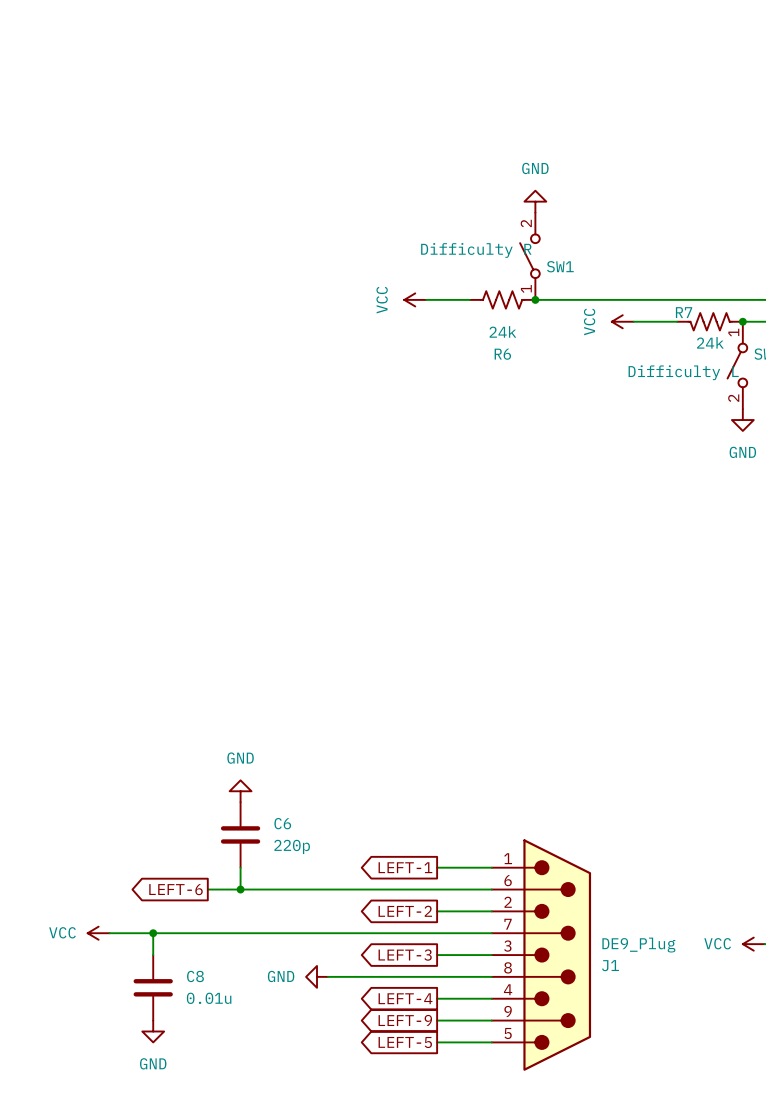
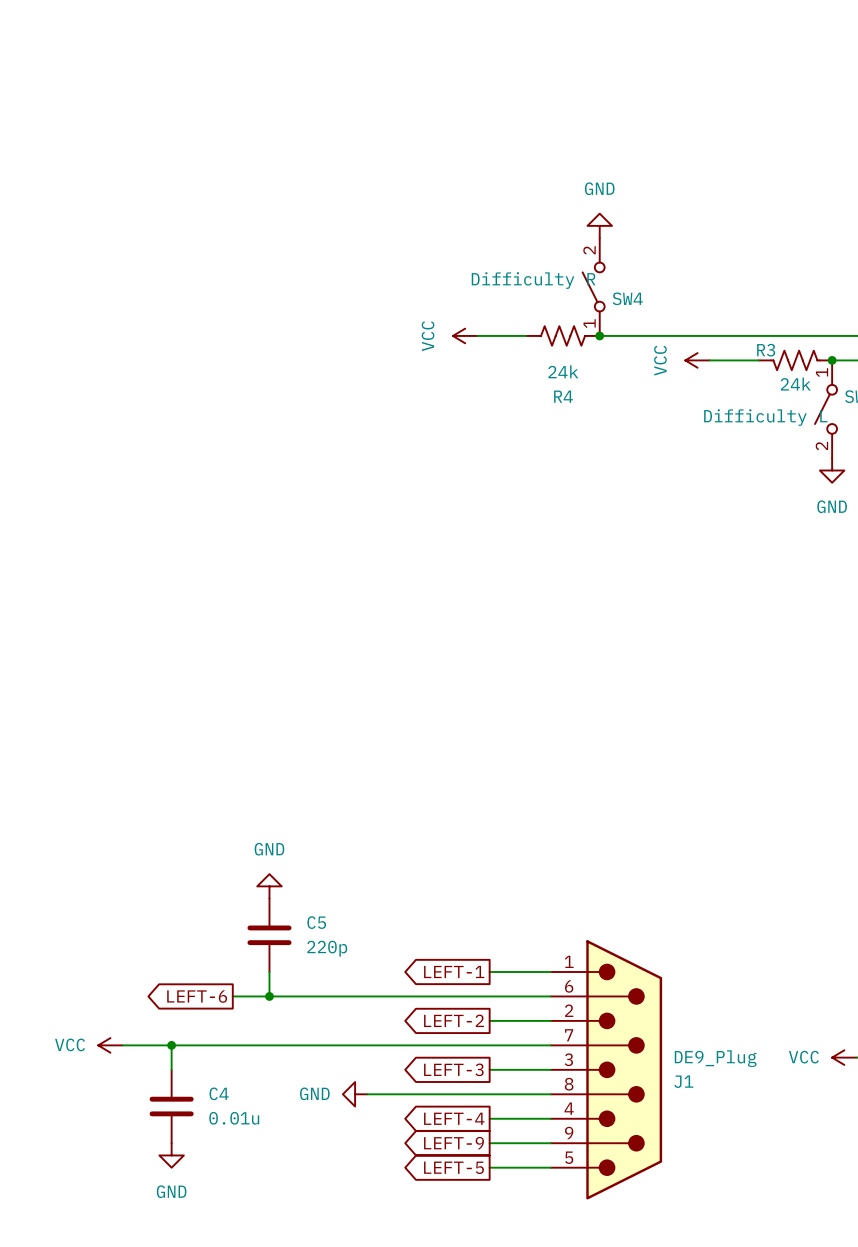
SW1 name: SW1 (560, 266) -> SW4 (627, 298)
R7 name: R7 (684, 312) -> R3 (766, 350)
R6 name: R6 (502, 354) -> R4 (563, 396)
C6 name: C6 (282, 823) -> C5 (316, 922)
C8 name: C8 (195, 976) -> C4 (219, 1093)

